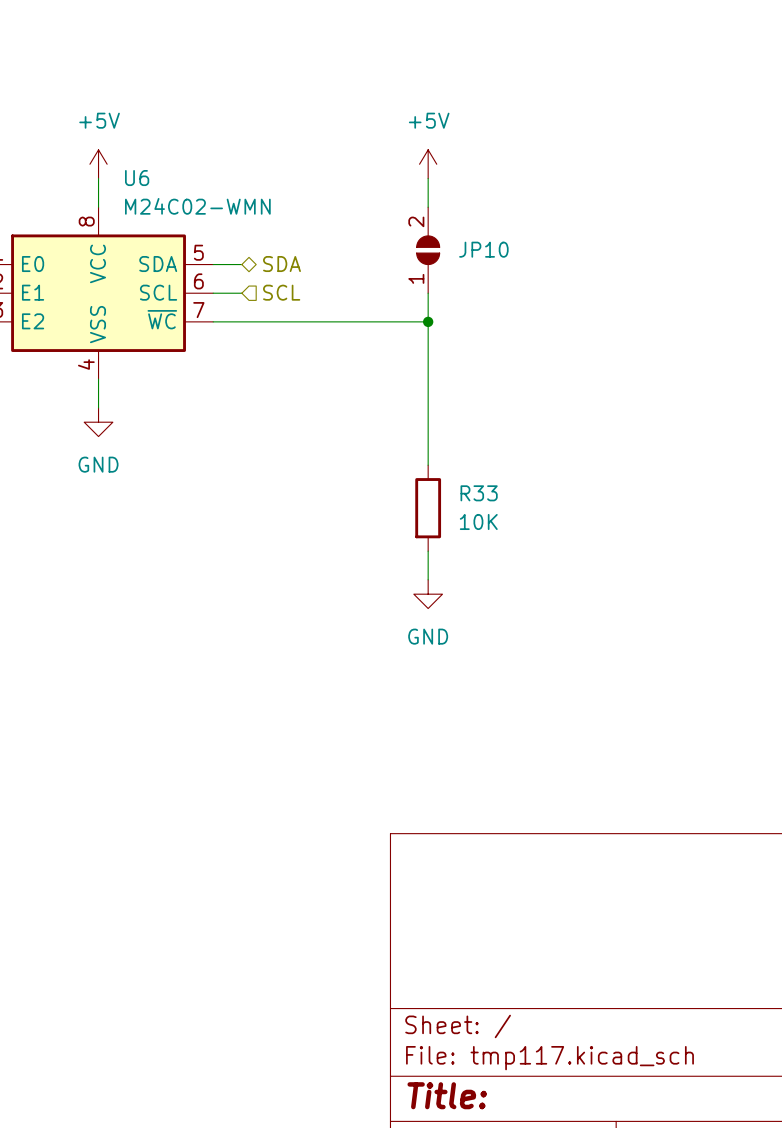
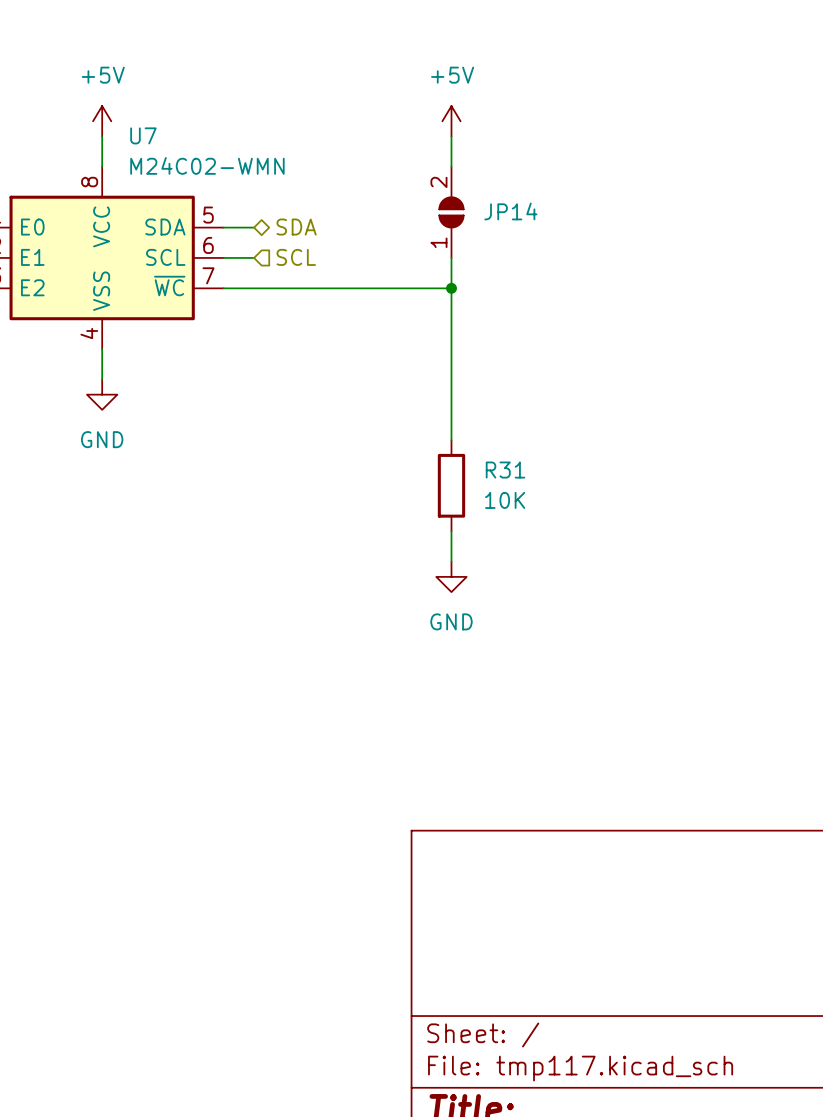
U6 name: U6 (137, 178) -> U7 (143, 135)
JP10 name: JP10 (483, 249) -> JP14 (510, 211)
R33 name: R33 (479, 493) -> R31 (505, 470)

